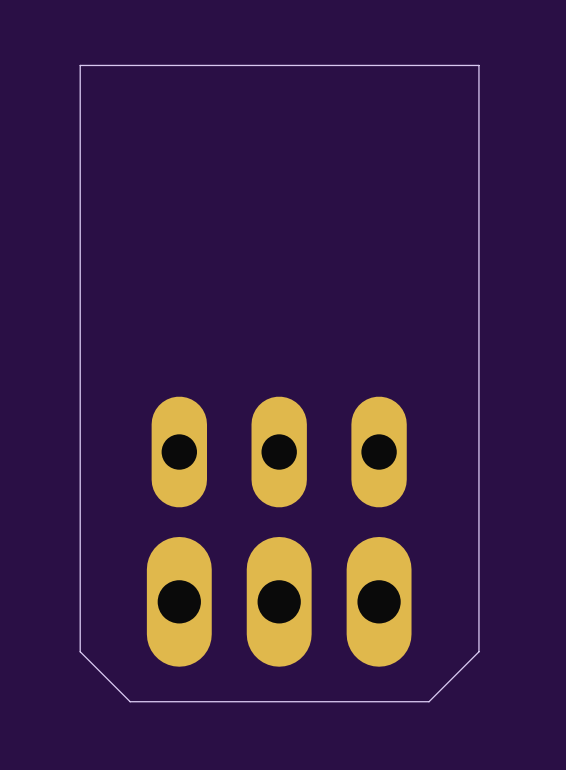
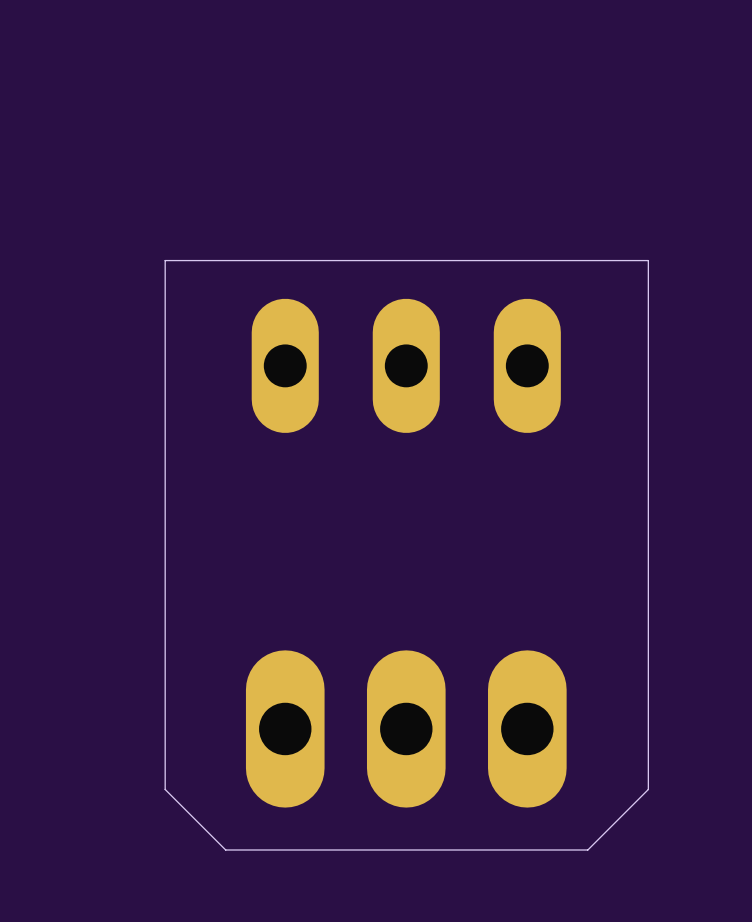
board edge: (478, 215) (478, 65) (80, 65) (80, 215) -> (648, 260) (165, 260)
part position: (279, 452) -> (406, 365)

